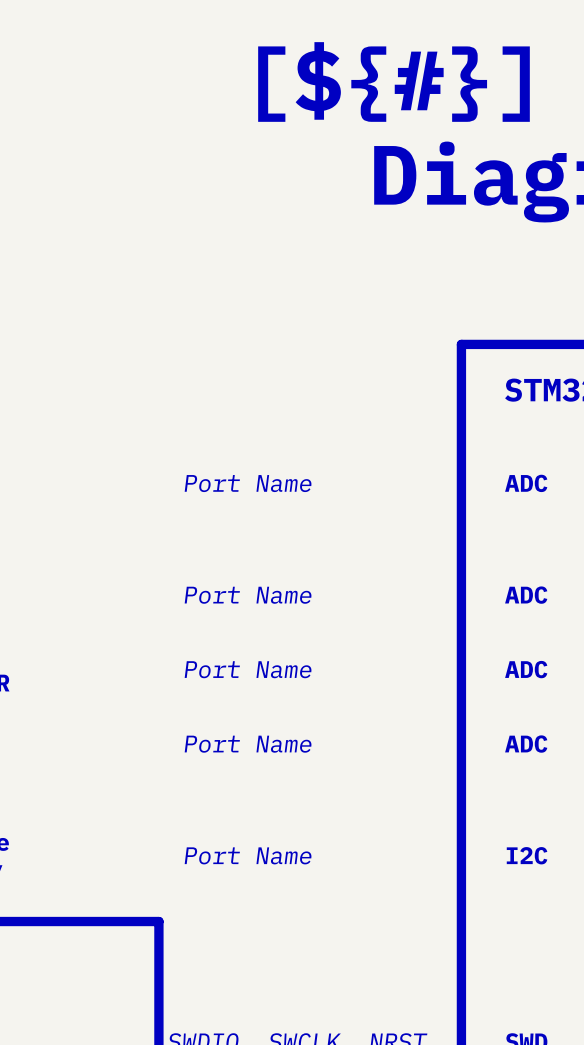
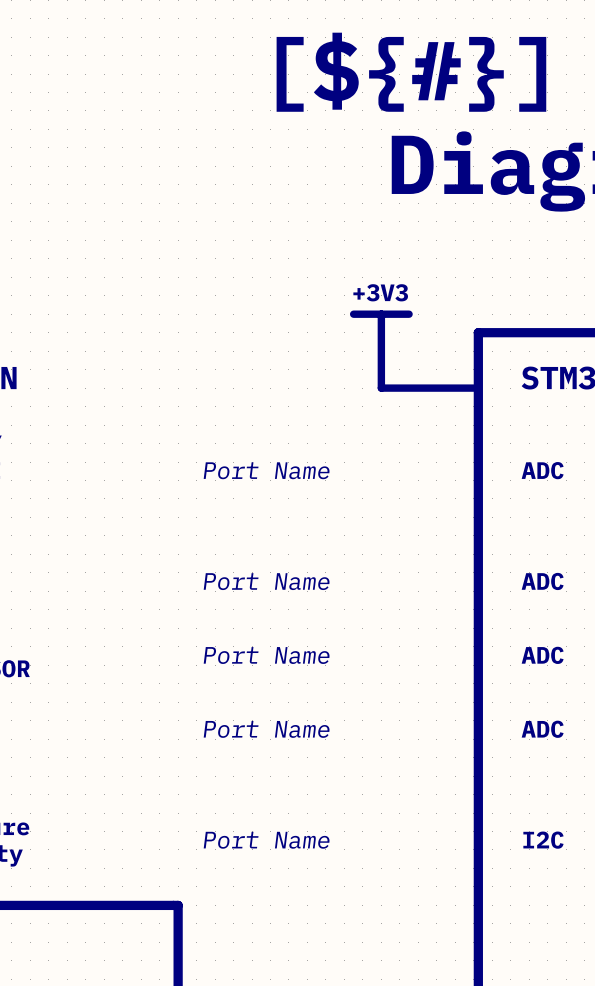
text: none -> +3V3 (380, 292)
line: none -> (353, 314) (409, 314)
line: none -> (381, 314) (381, 388) (473, 388)

